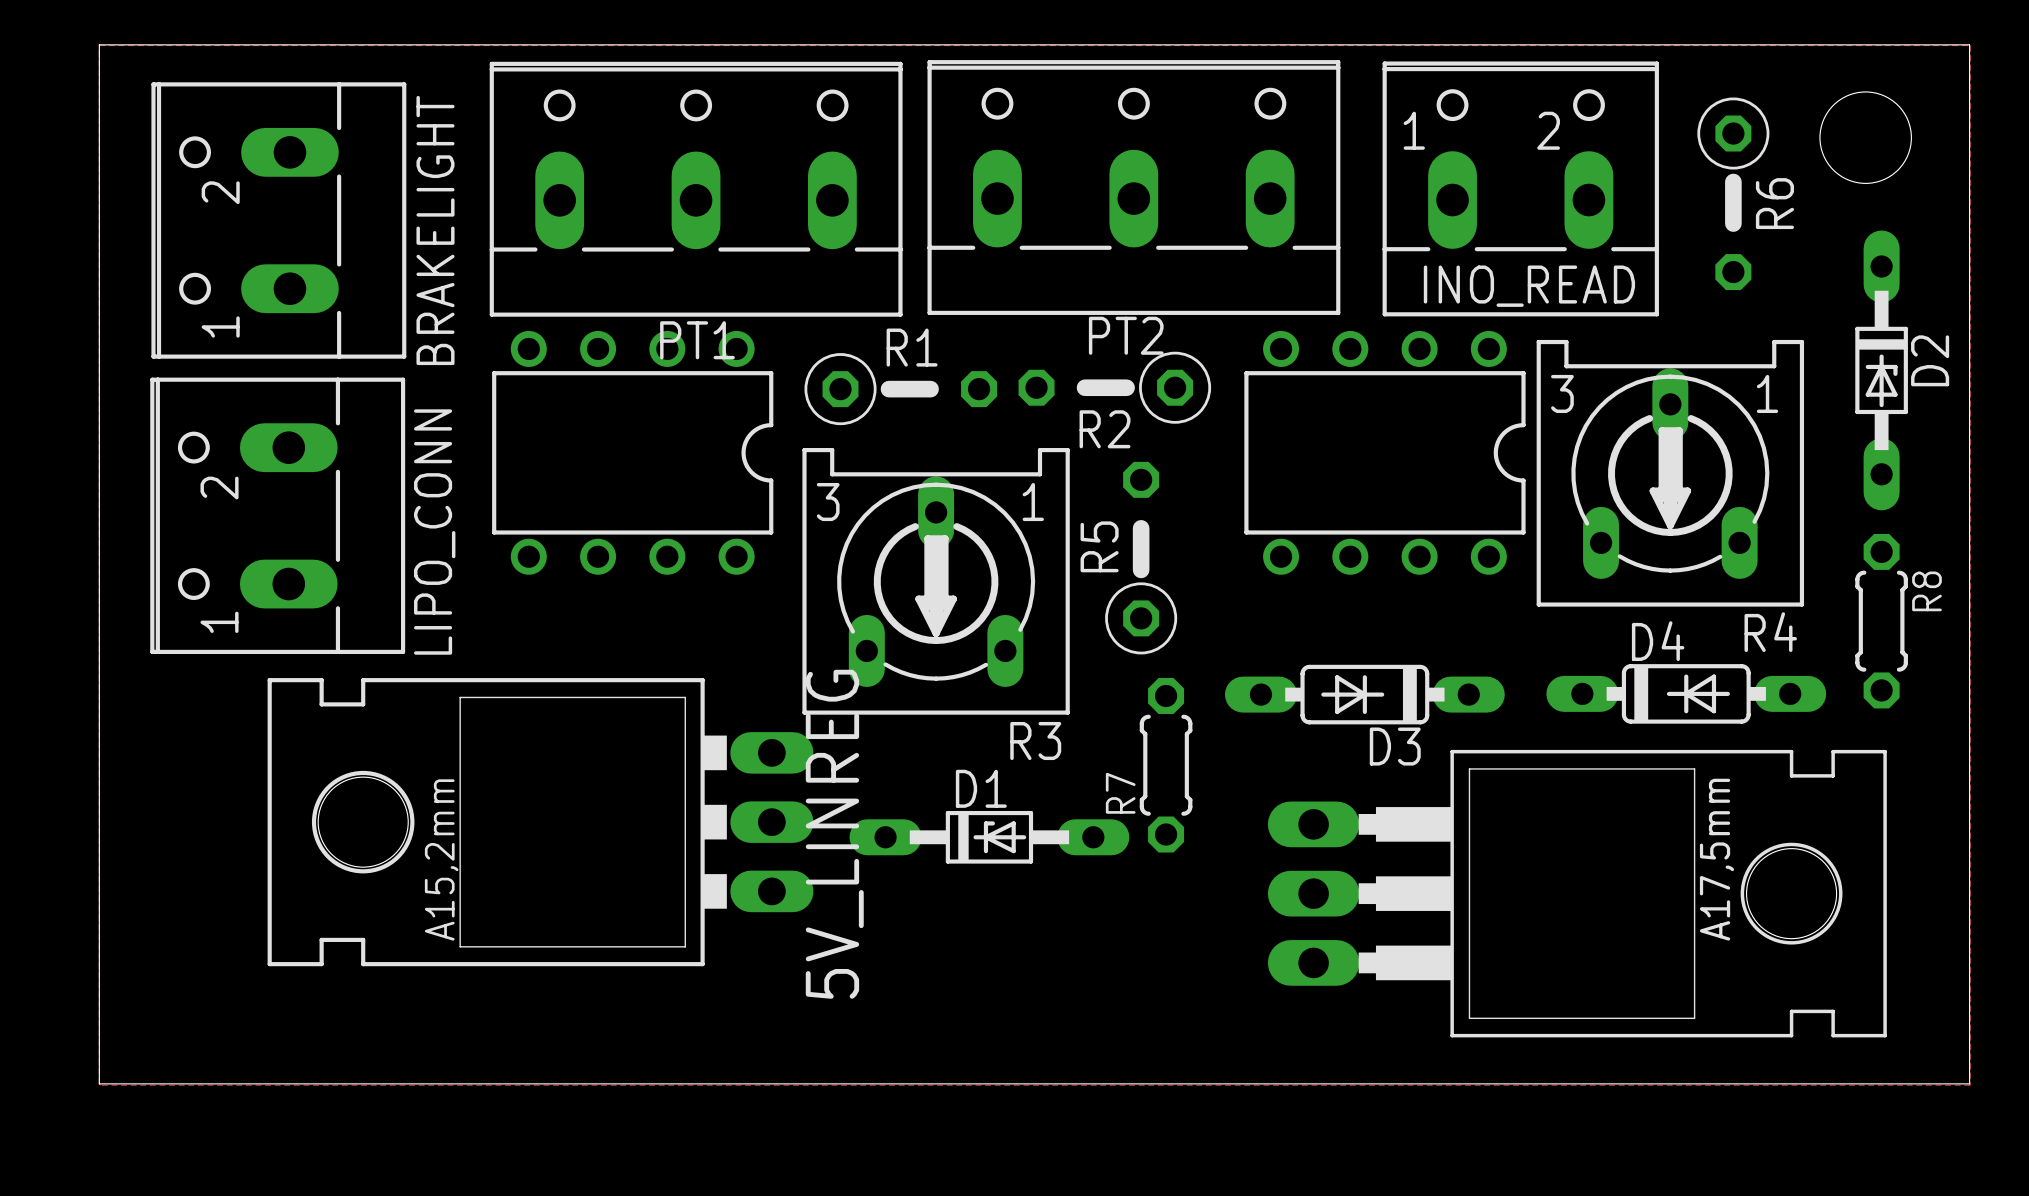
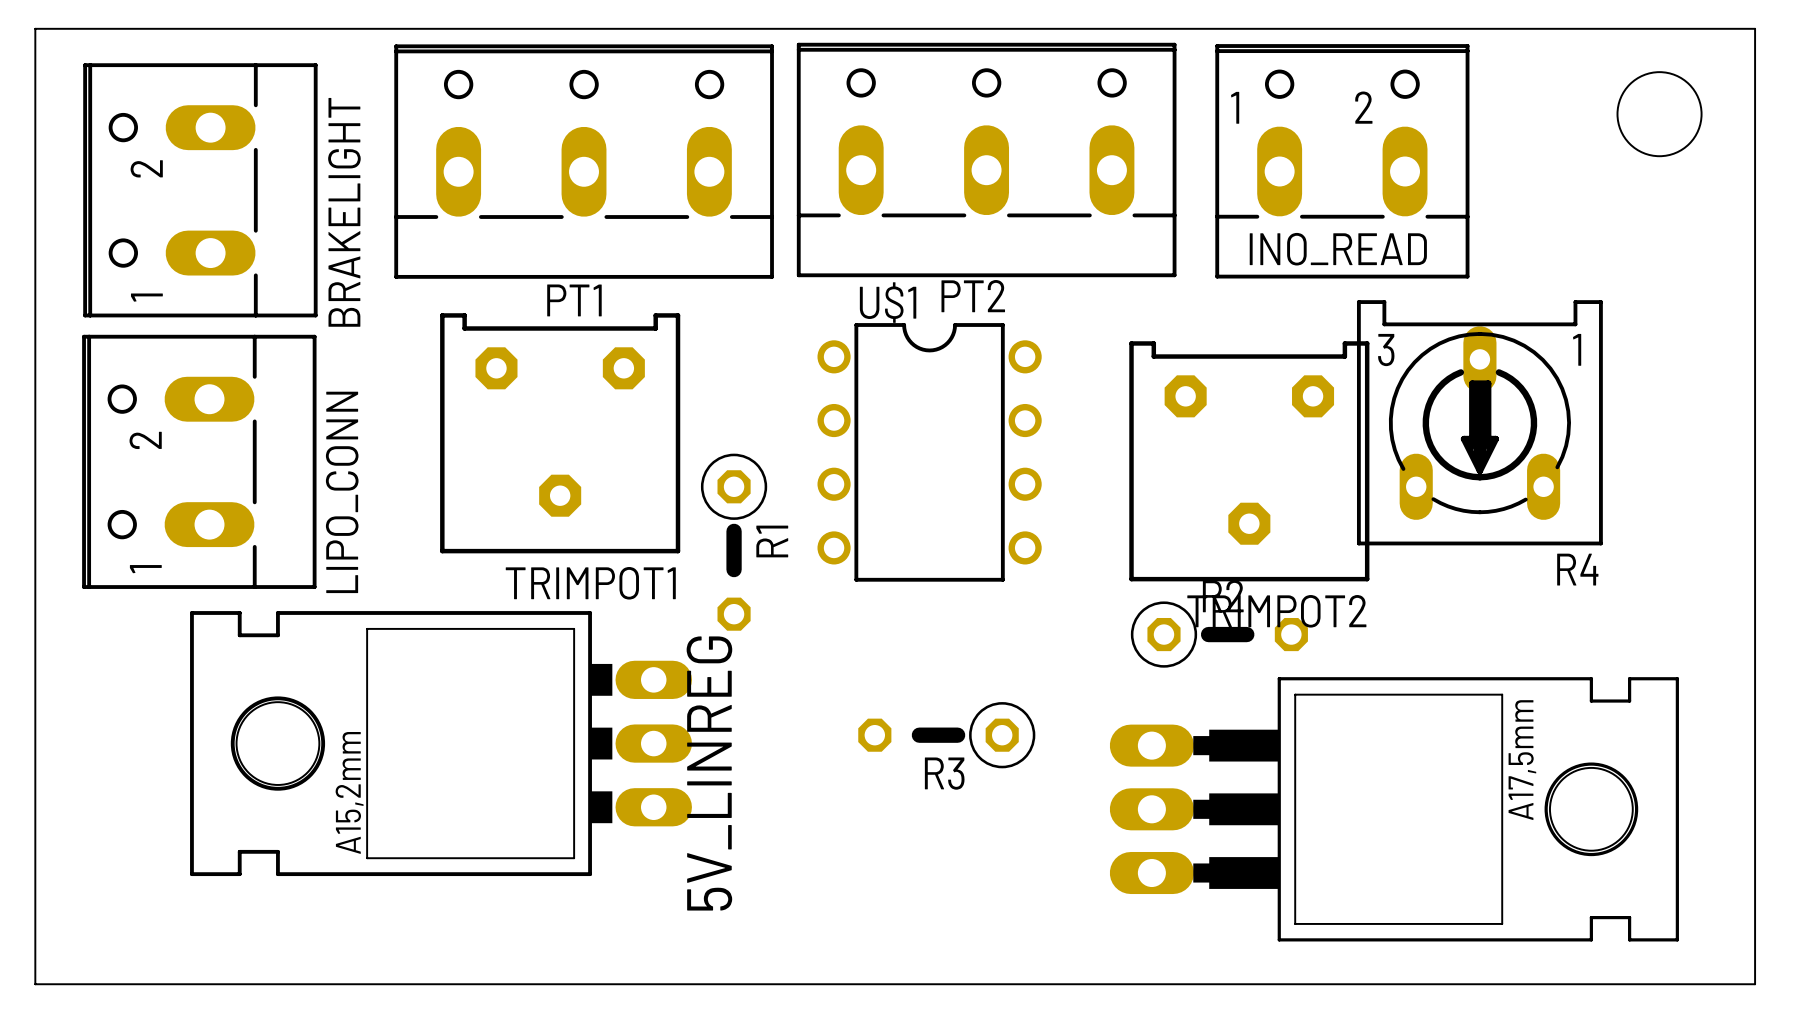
zone outline: (99, 45) (1970, 45) (1970, 1085) (100, 1085) (99, 45) -> none
R6: (1733, 193) -> none
D2: (1881, 370) -> none
R2 rotation: 0° (1114, 387) -> 180° (1219, 634)
R2 position: (1114, 387) -> (1219, 634)
R1 rotation: 0° (900, 389) -> 90° clockwise (734, 542)
R1 position: (900, 389) -> (734, 542)
R3 footprint: [802, 448, 1070, 715] -> [858, 702, 1036, 769]
part: (632, 452) -> none
part: (1384, 452) -> none
TRIMPOT1: none -> (560, 433)
U$1: none -> (929, 452)
TRIMPOT2: none -> (1249, 461)
R5: (1141, 558) -> none
R8: (1881, 621) -> none
D4: (1686, 693) -> none
D3: (1364, 694) -> none
R3 name position: R3 (1035, 741) -> R3 (944, 773)
R7: (1166, 765) -> none
D1: (989, 837) -> none

